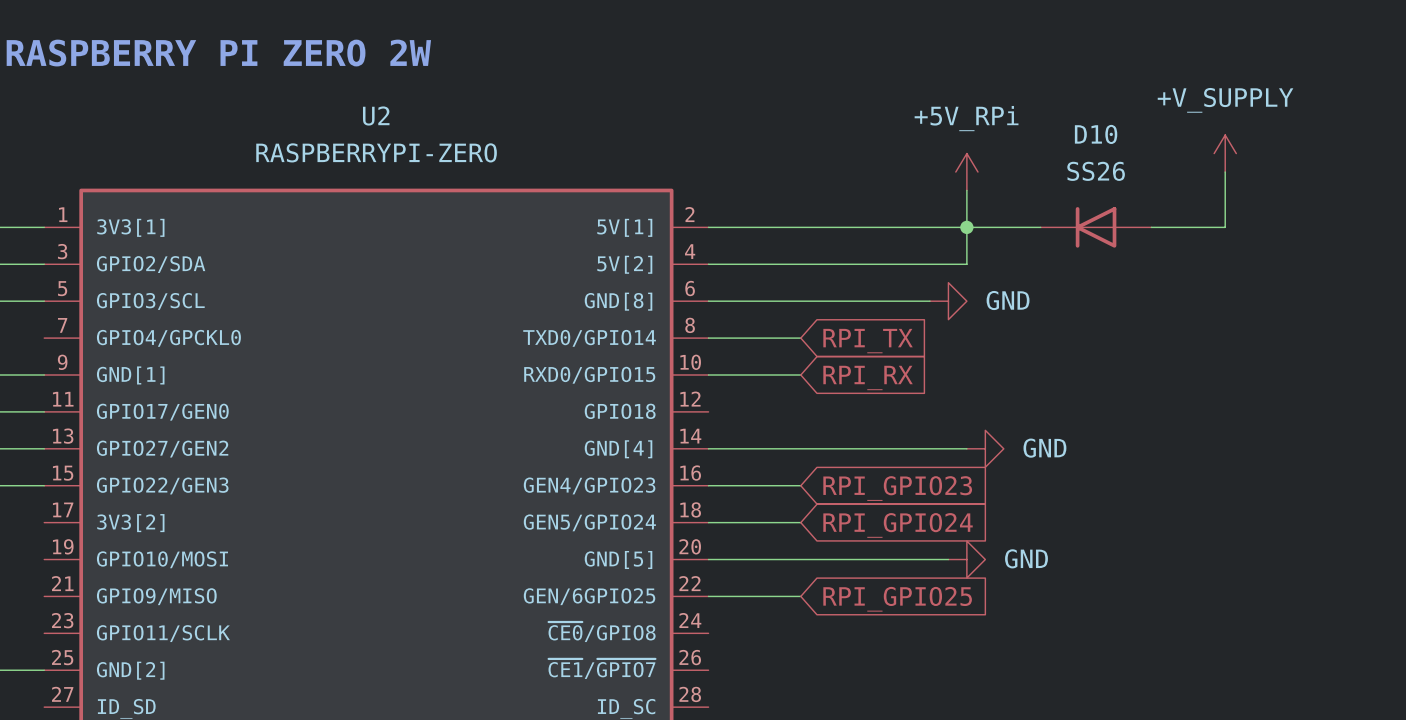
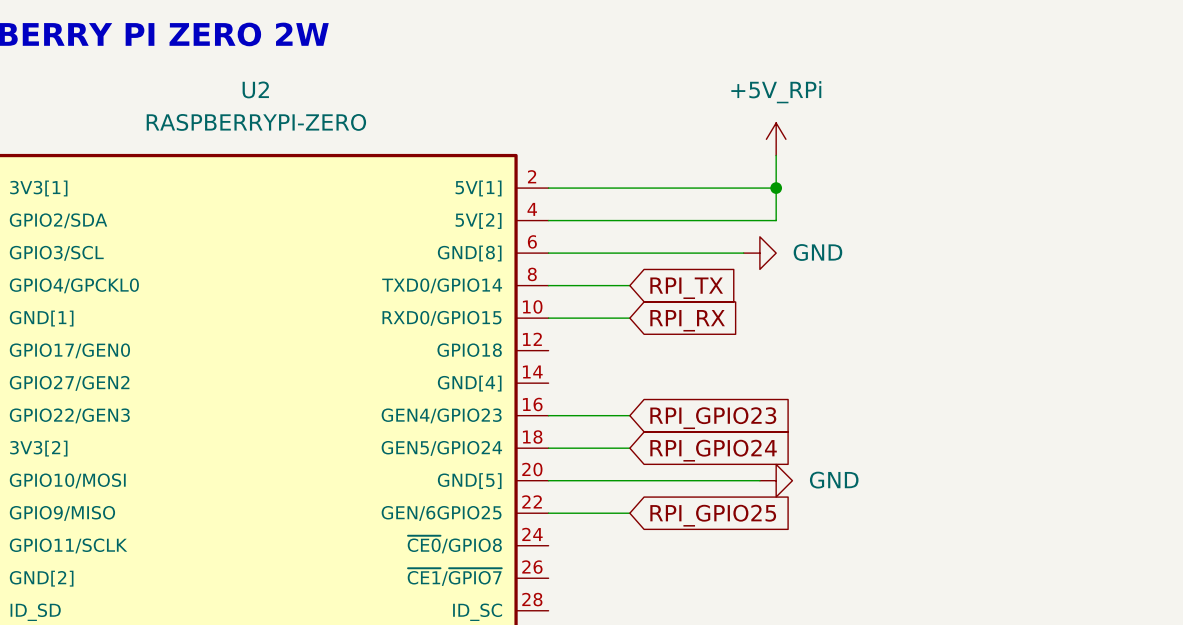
power symbol: +V_SUPPLY (1225, 153) -> none
wire: (1225, 172) (1225, 227) (1151, 227) -> none
wire: (966, 227) (1040, 227) -> none
D10: SS26 (1096, 227) -> none
wire: (708, 448) (966, 448) -> none
power symbol: GND (985, 448) -> none

